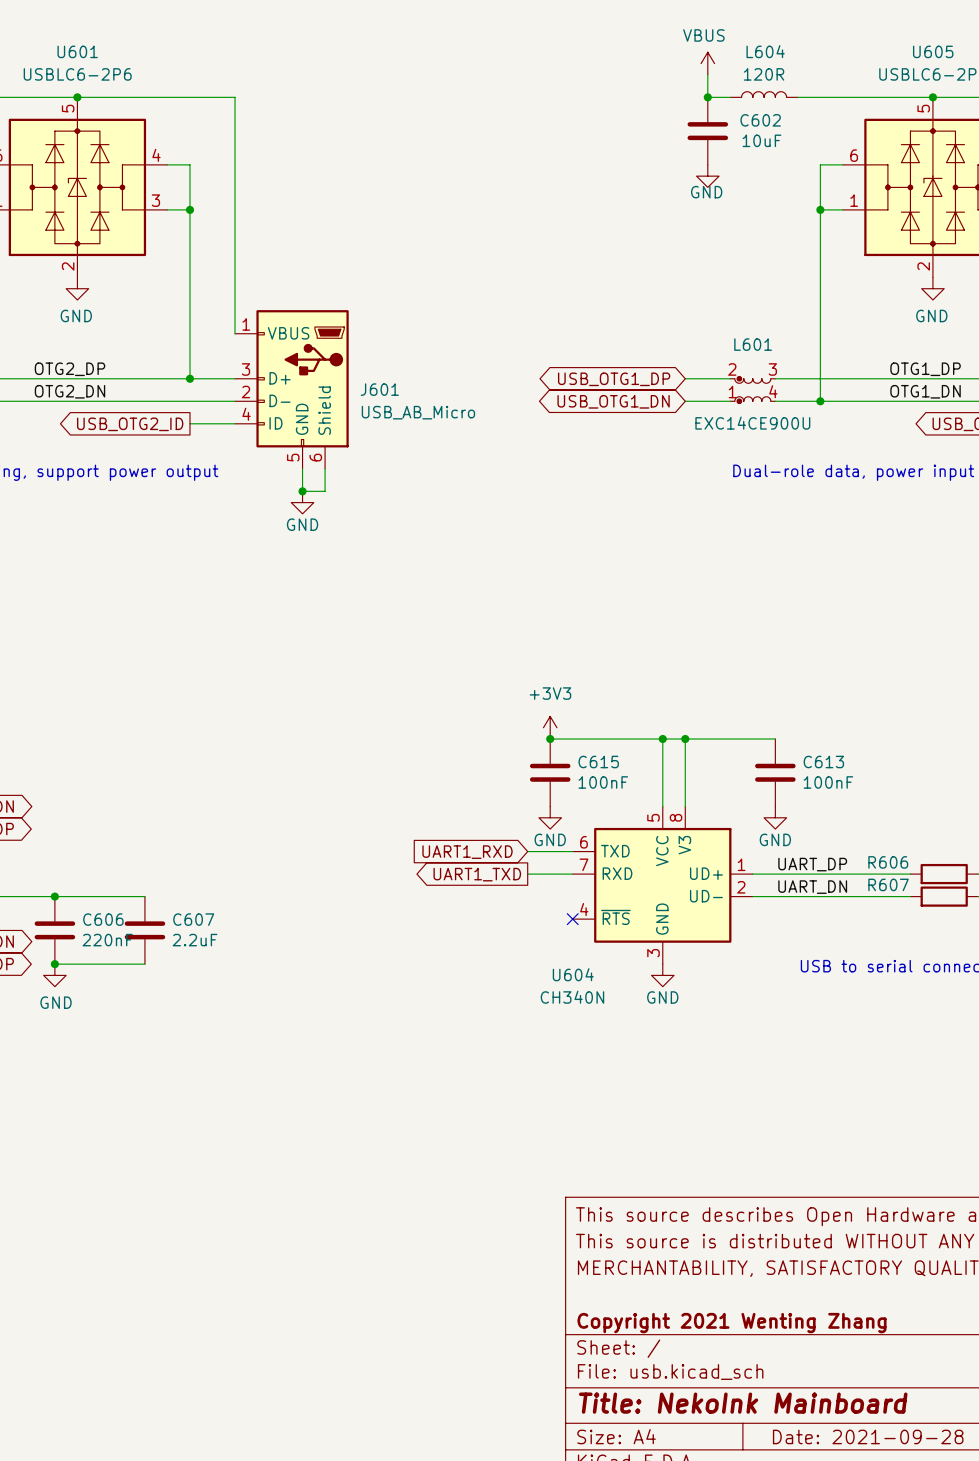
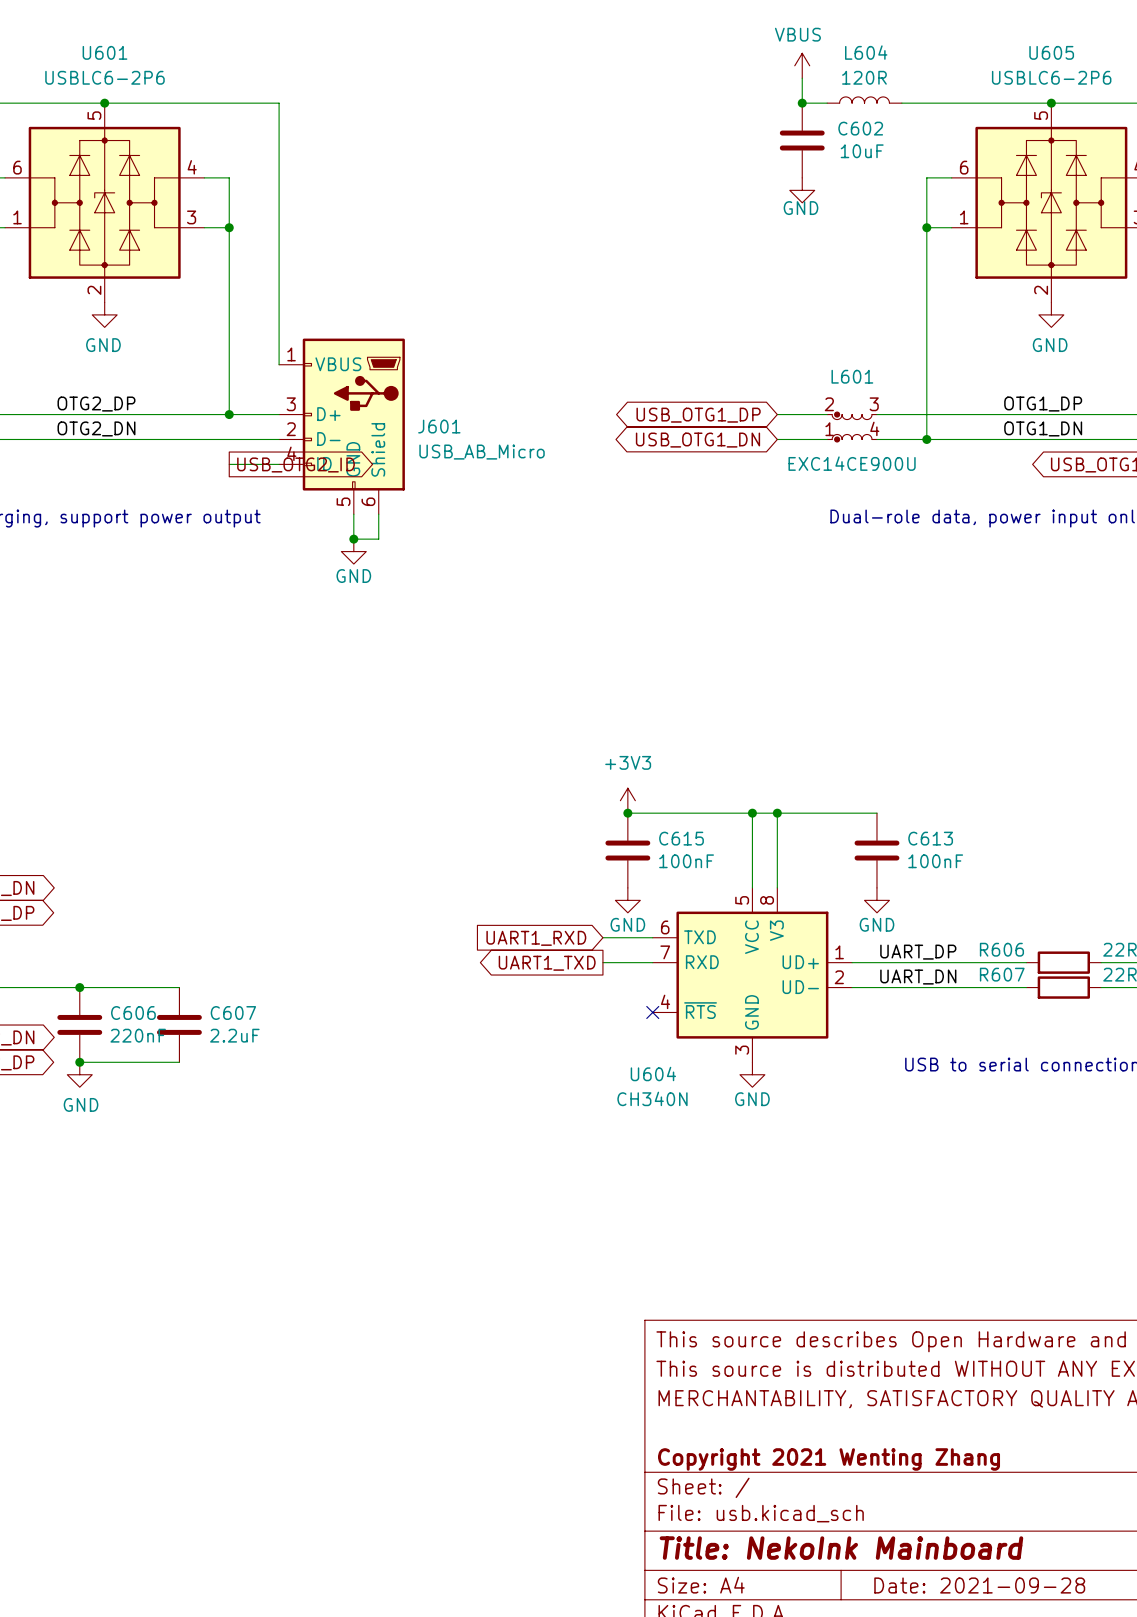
global label rotation: 0° (130, 424) -> 180° (296, 464)
global label position: USB_OTG2_ID (130, 424) -> USB_OTG2_ID (296, 464)

